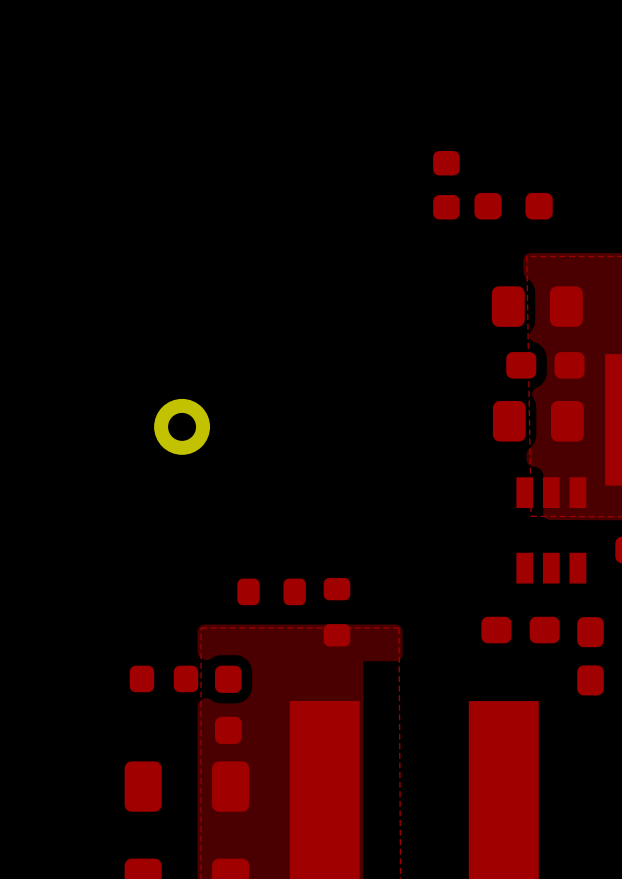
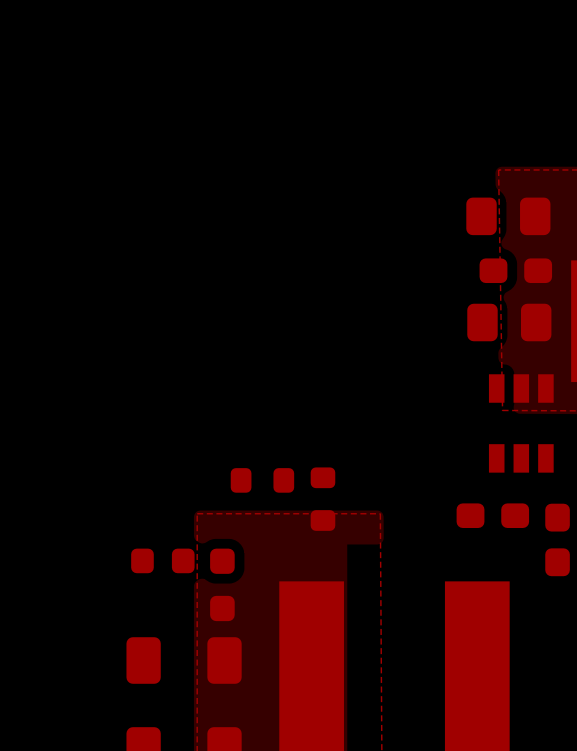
part: (446, 185) -> none
part: (513, 206) -> none
part: (182, 426) -> none

